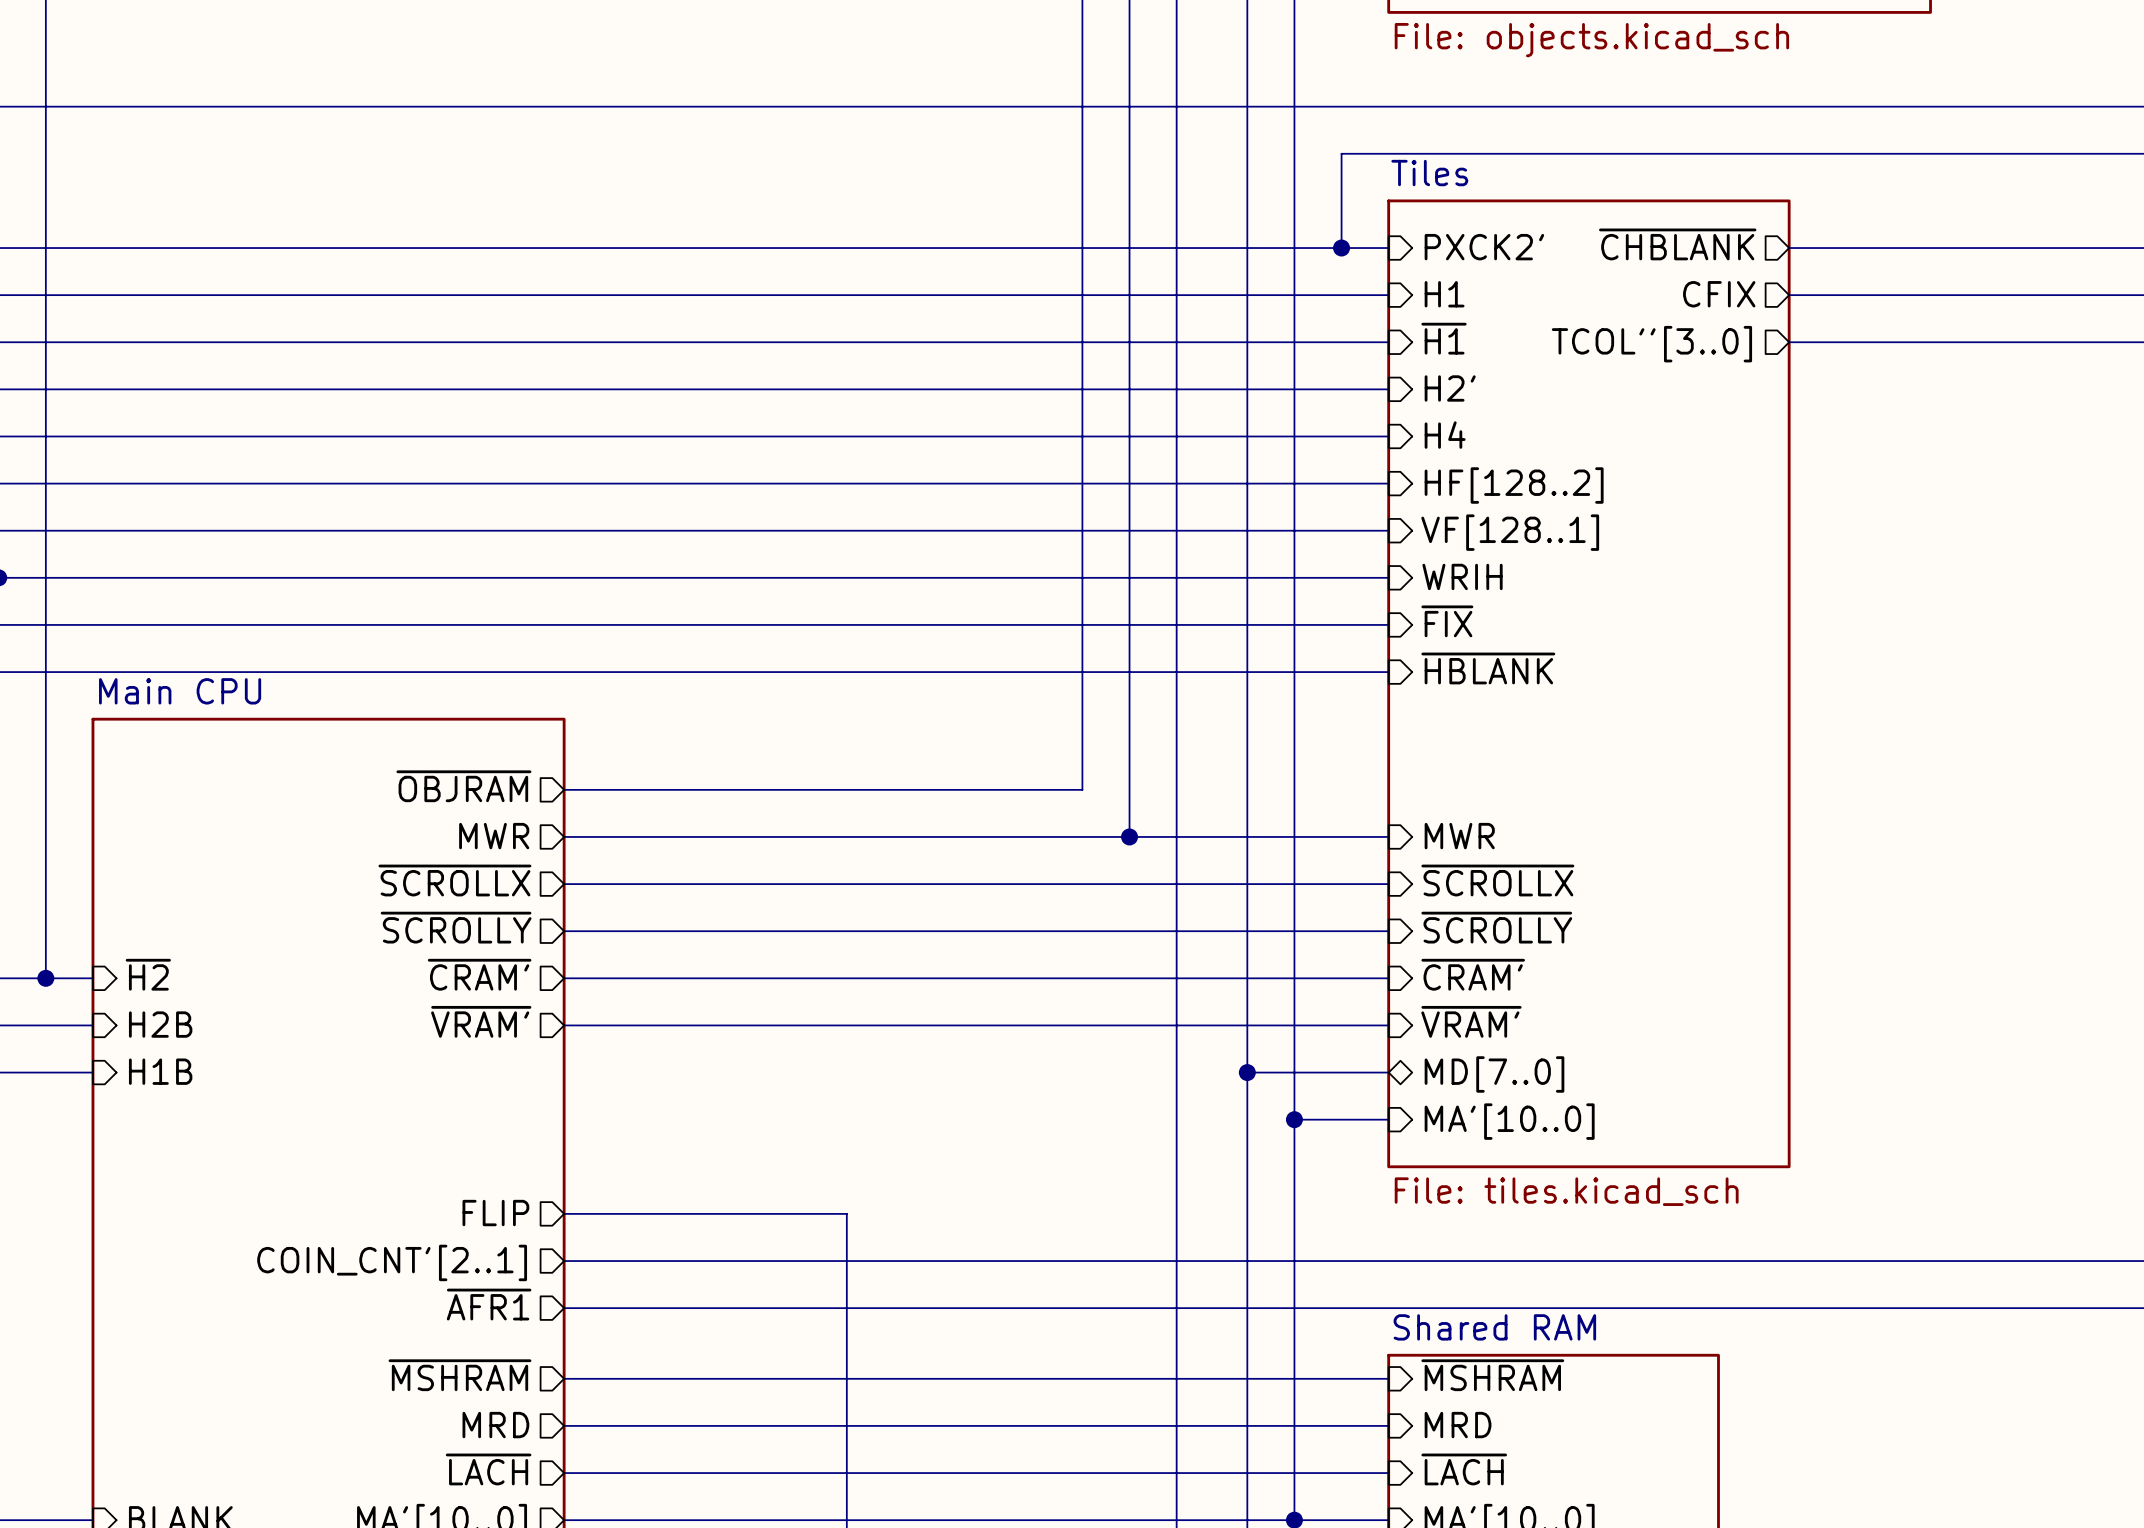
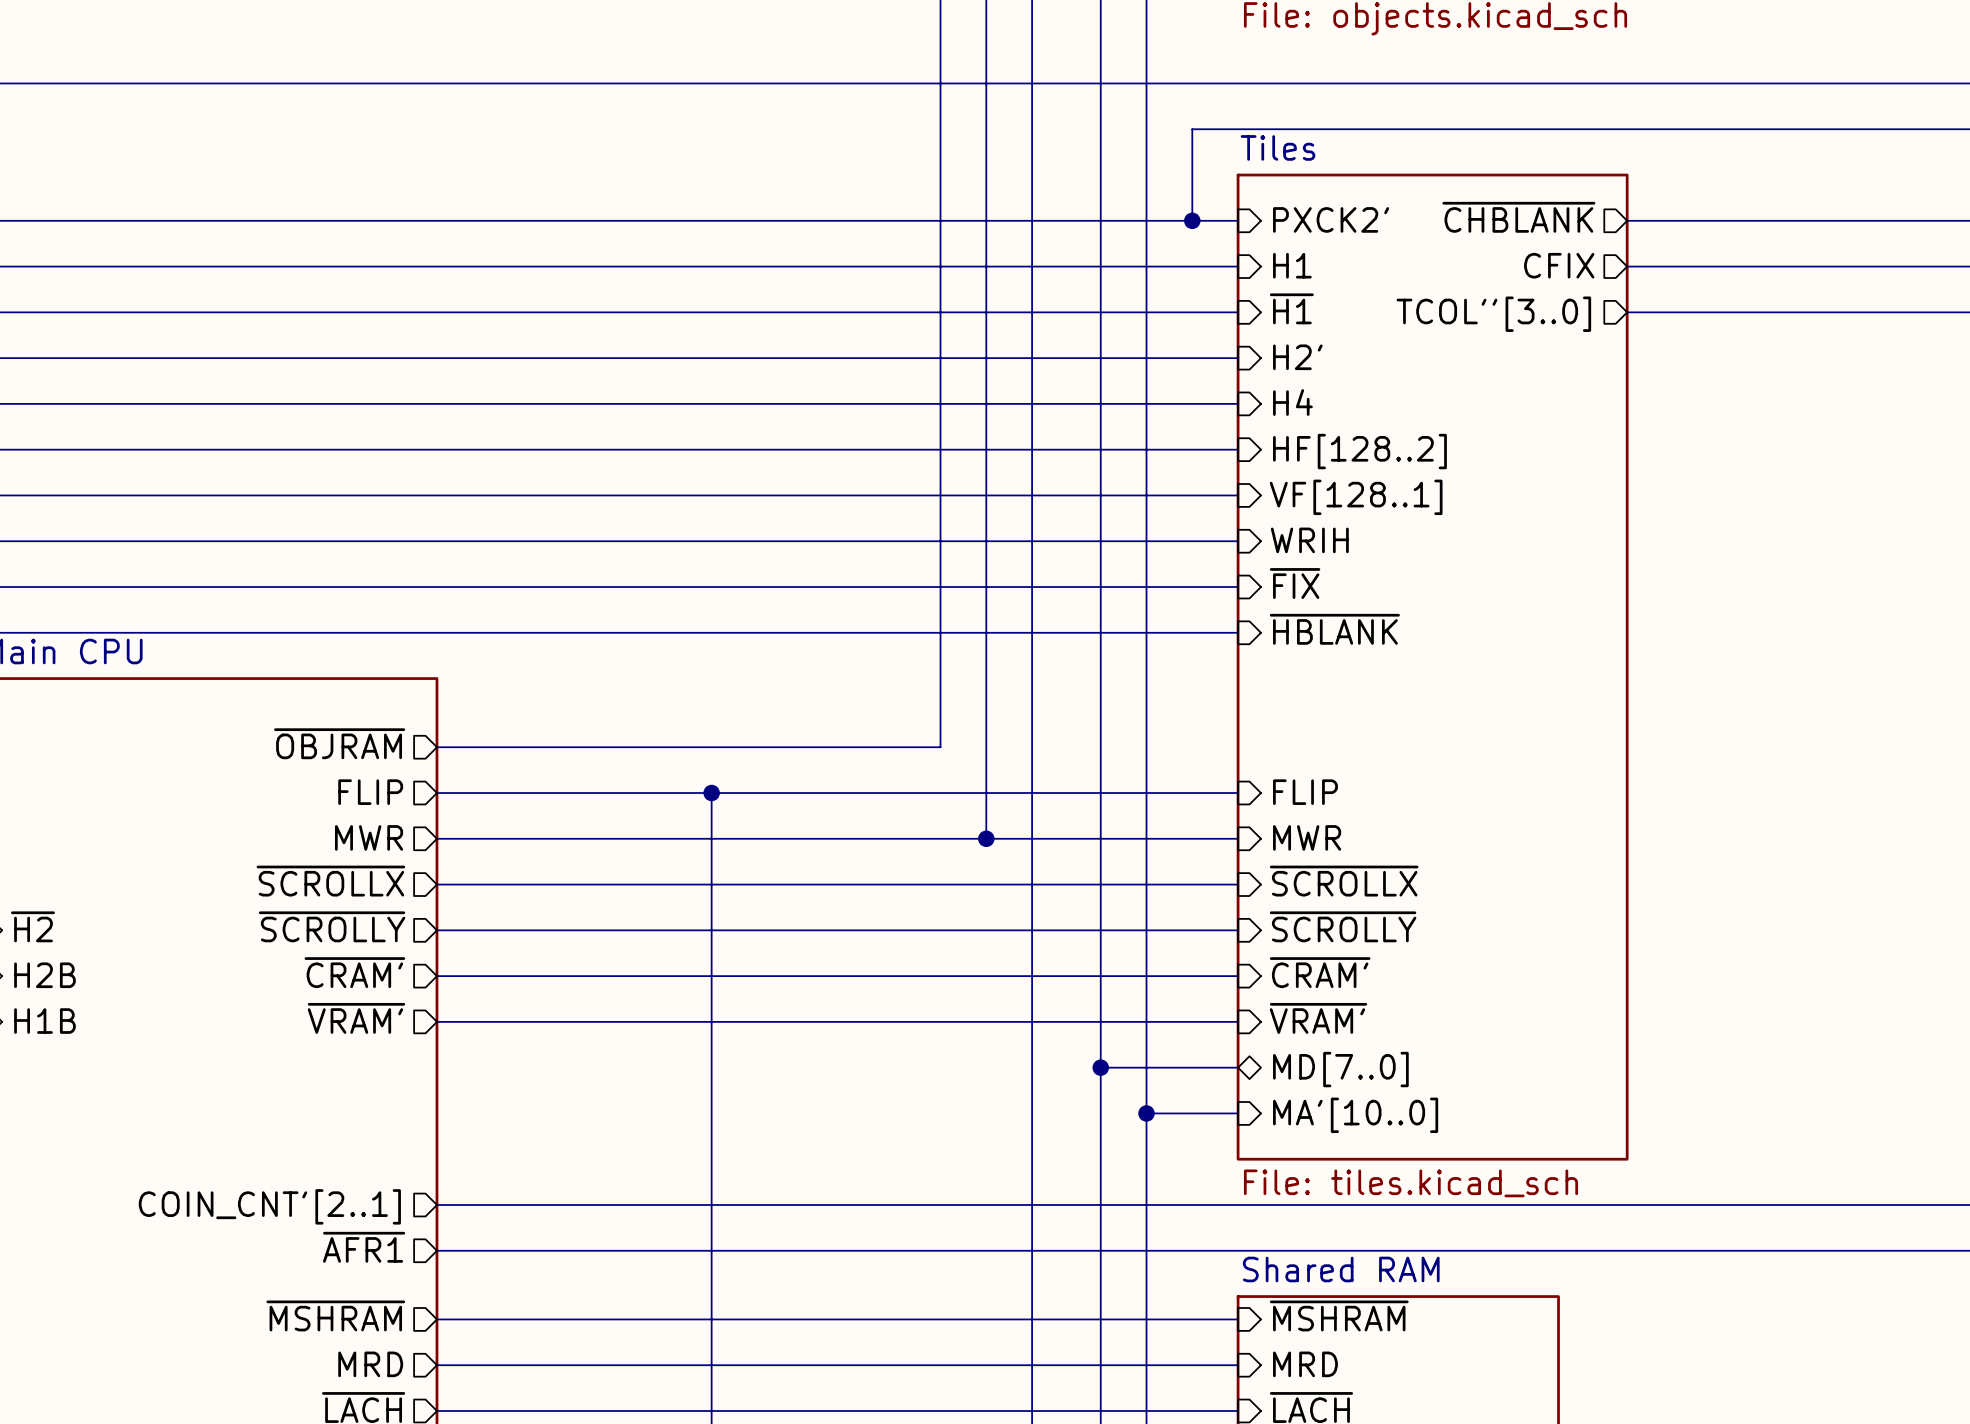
sheet Tiles: File: tiles.kicad_sch (1588, 683) -> none
sheet Tiles: none -> File: tiles.kicad_sch (1432, 667)
sheet pin: MWR (494, 836) -> FLIP (370, 792)
junction: none -> (711, 793)
wire: none -> (986, 793) (986, 838)
junction position: (1129, 836) -> (986, 838)
sheet pin: MWR (1459, 836) -> FLIP (1305, 792)
sheet pin: ~{SCROLLX} (454, 880) -> MWR (369, 837)
sheet pin: ~{SCROLLX} (1497, 880) -> MWR (1307, 837)
sheet pin: ~{SCROLLY} (456, 927) -> ~{SCROLLX} (330, 881)
sheet pin: ~{SCROLLY} (1496, 927) -> ~{SCROLLX} (1344, 881)
sheet pin: ~{CRAM'} (479, 974) -> ~{SCROLLY} (332, 926)
sheet pin: ~{CRAM'} (1473, 974) -> ~{SCROLLY} (1343, 926)
sheet pin: ~{VRAM'} (481, 1021) -> ~{CRAM'} (354, 972)
sheet pin: ~{VRAM'} (1471, 1021) -> ~{CRAM'} (1320, 972)
sheet pin: none -> ~{VRAM'} (356, 1018)
wire: none -> (436, 1021) (1238, 1021)
bus: (1247, 1072) (1388, 1072) -> none
junction: (1247, 1072) -> none
sheet pin shape: bidirectional (1494, 1074) -> input (1318, 1018)
sheet pin: MD[7..0] (1494, 1074) -> ~{VRAM'} (1318, 1018)
bus: none -> (1100, 1067) (1146, 1067)
junction: none -> (1100, 1067)
junction: (1294, 1119) -> none
sheet pin shape: input (1509, 1121) -> bidirectional (1340, 1069)
sheet pin: MA'[10..0] (1509, 1121) -> MD[7..0] (1340, 1069)
bus: none -> (1146, 1113) (1238, 1113)
junction: none -> (1146, 1113)
sheet pin: none -> MA'[10..0] (1355, 1115)
sheet pin: FLIP (495, 1213) -> none
wire: (564, 1213) (846, 1213) -> (711, 793) (711, 1159)

